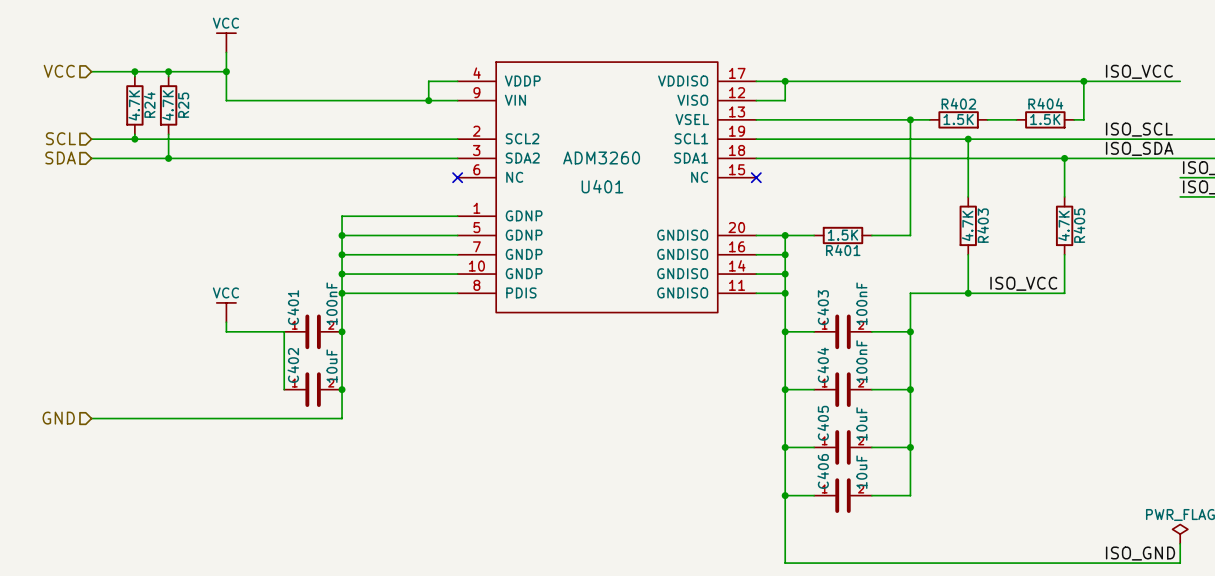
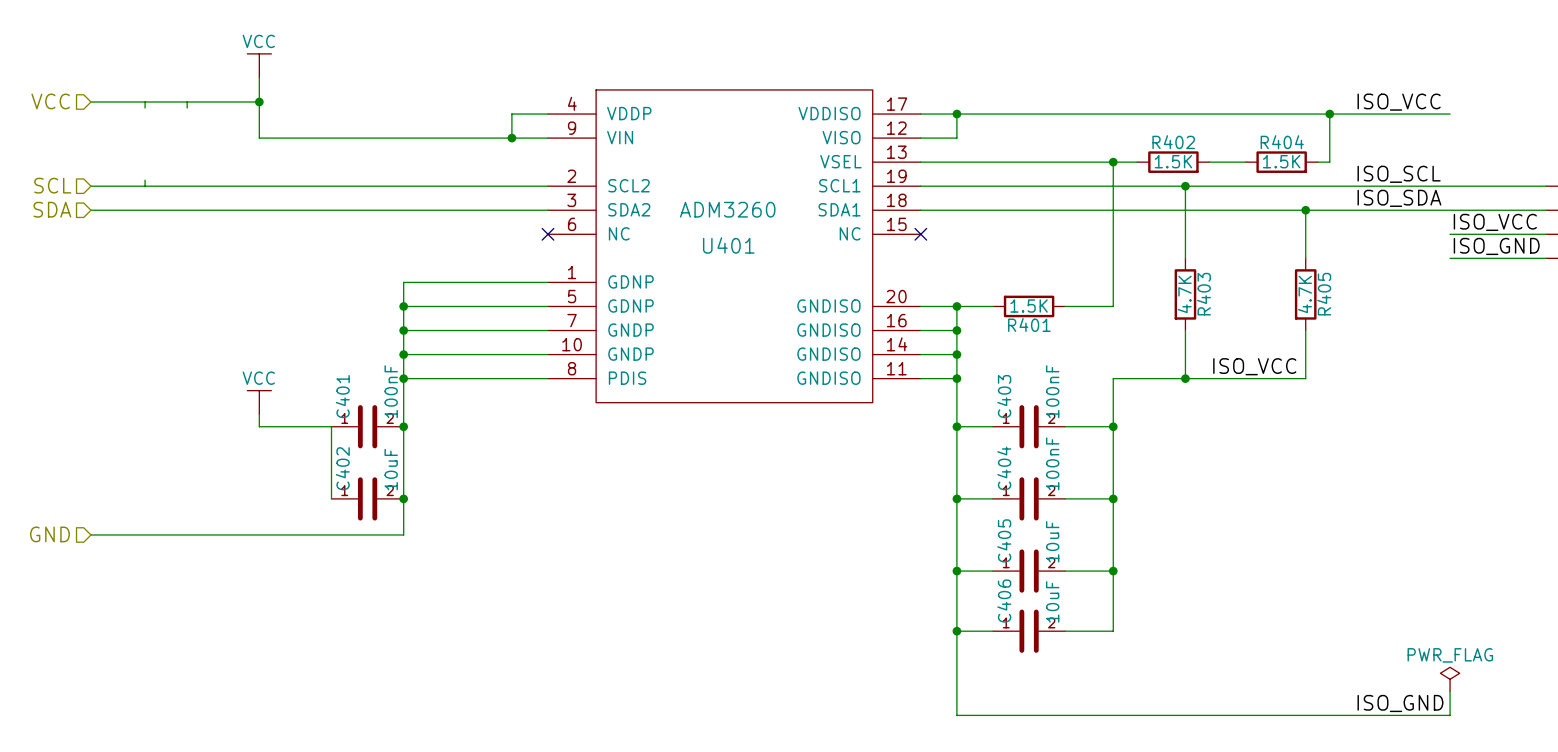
junction: (134, 71) -> none
junction: (168, 71) -> none
R24: 4.7K (134, 105) -> none
R25: 4.7K (168, 105) -> none
wire: (168, 134) (168, 158) -> none
junction: (134, 139) -> none
junction: (168, 158) -> none

